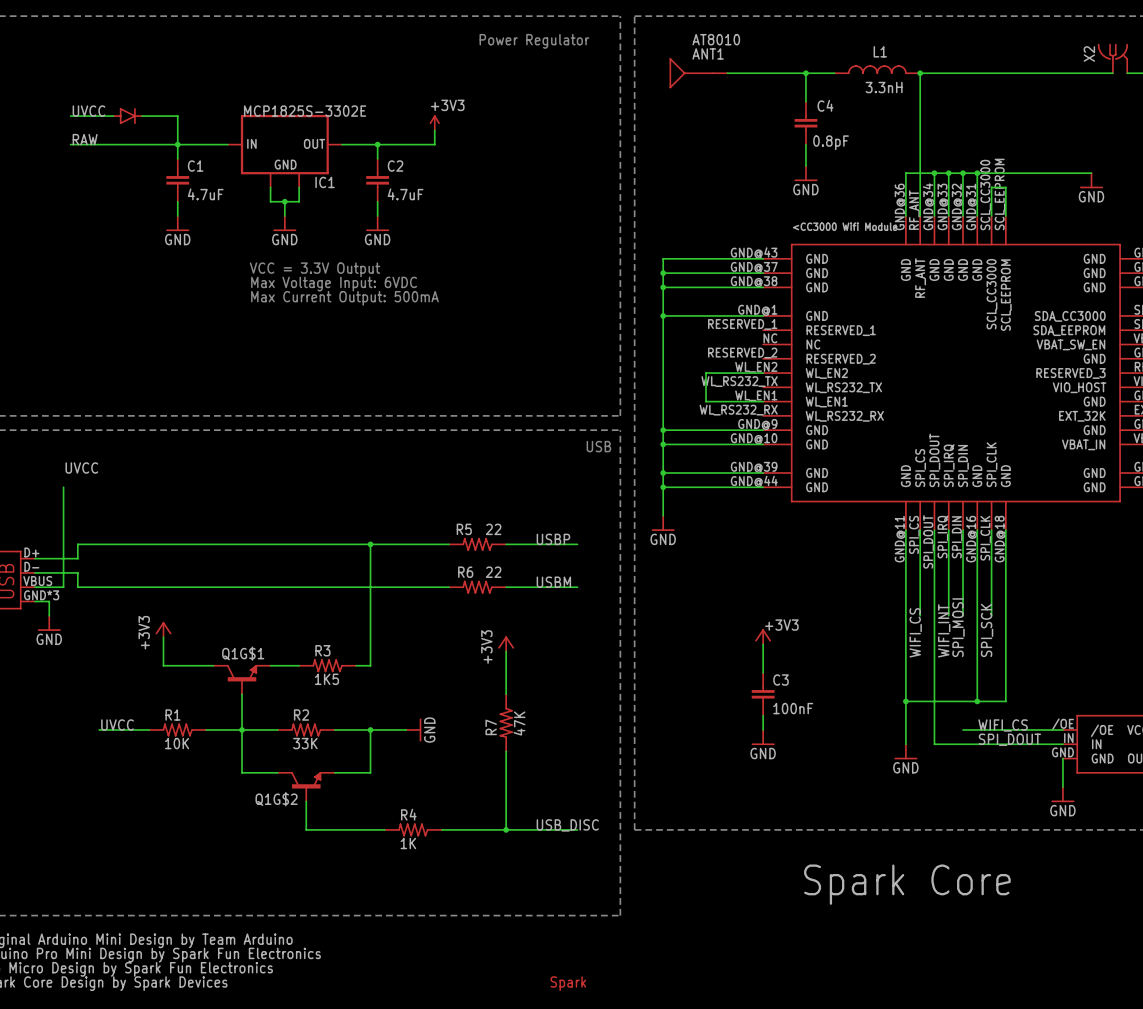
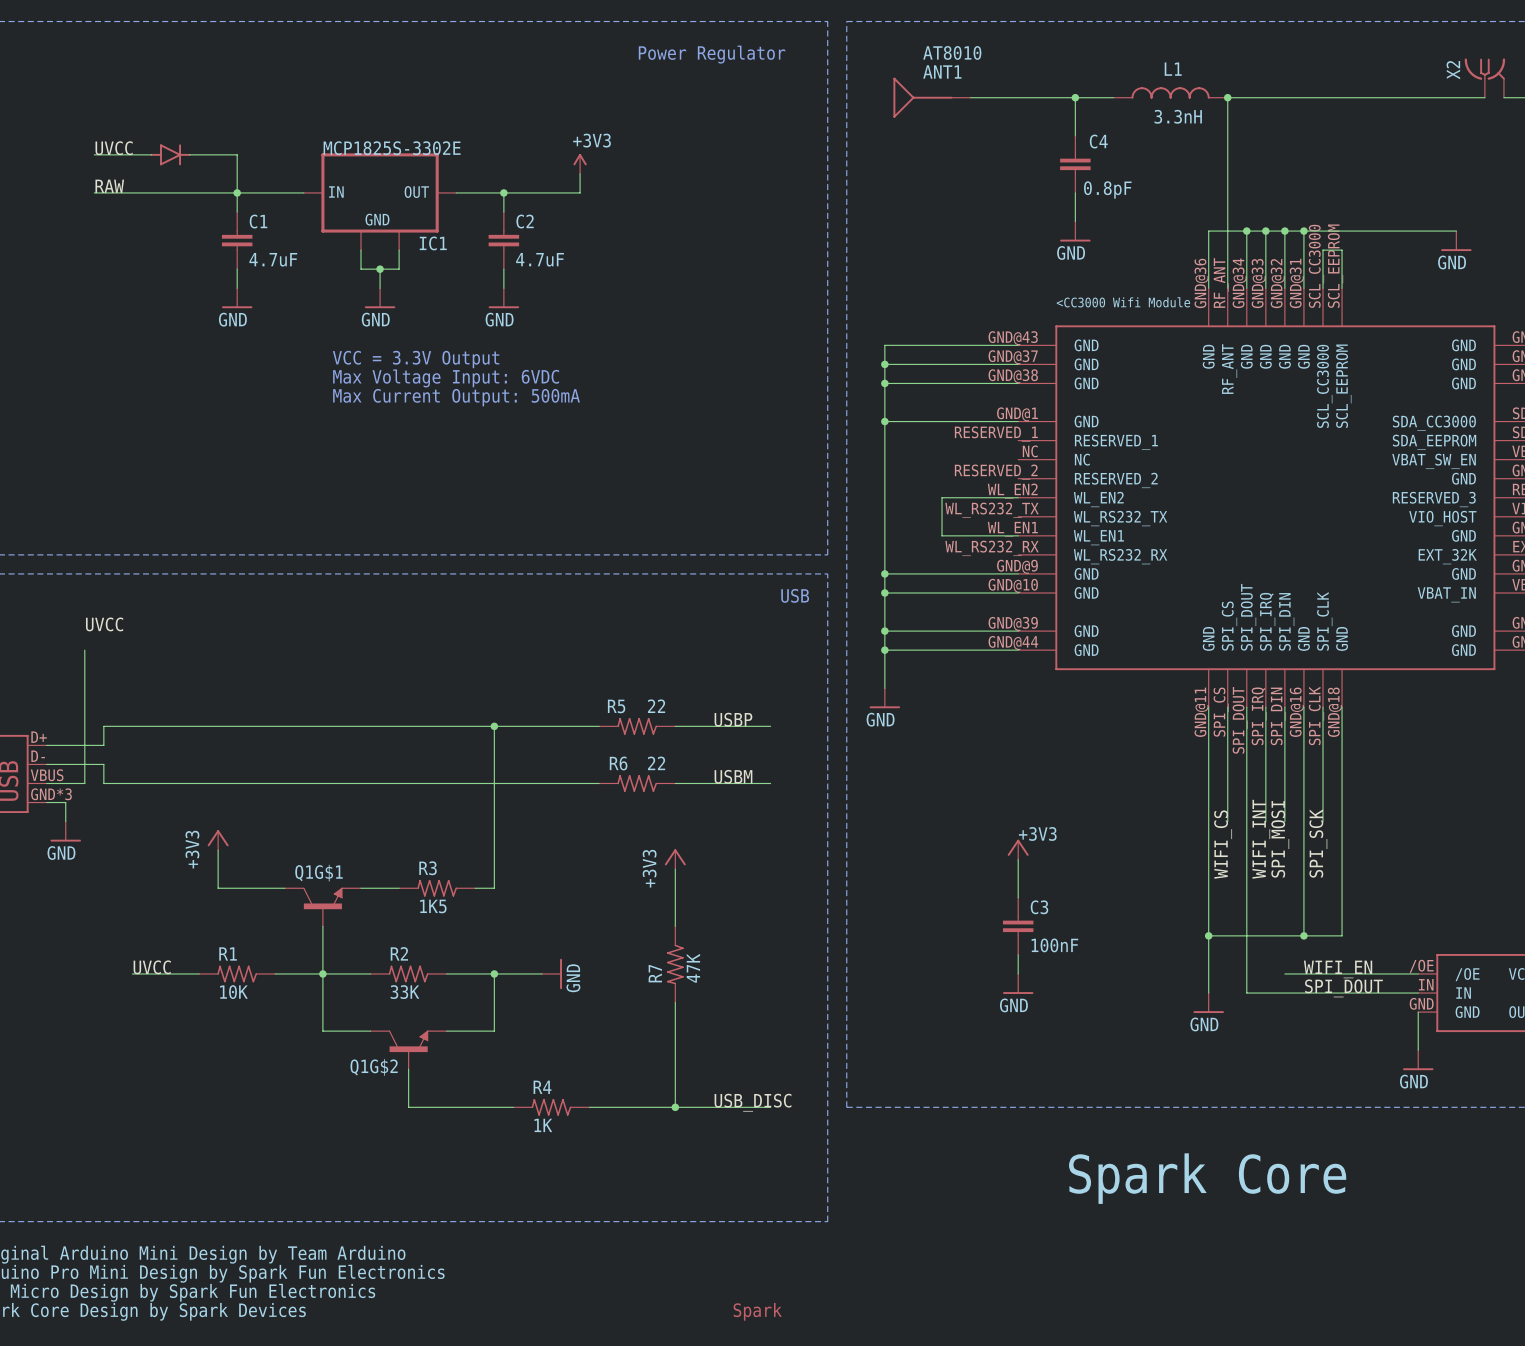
label: WIFI_CS (1003, 725) -> WIFI_EN (1338, 969)

